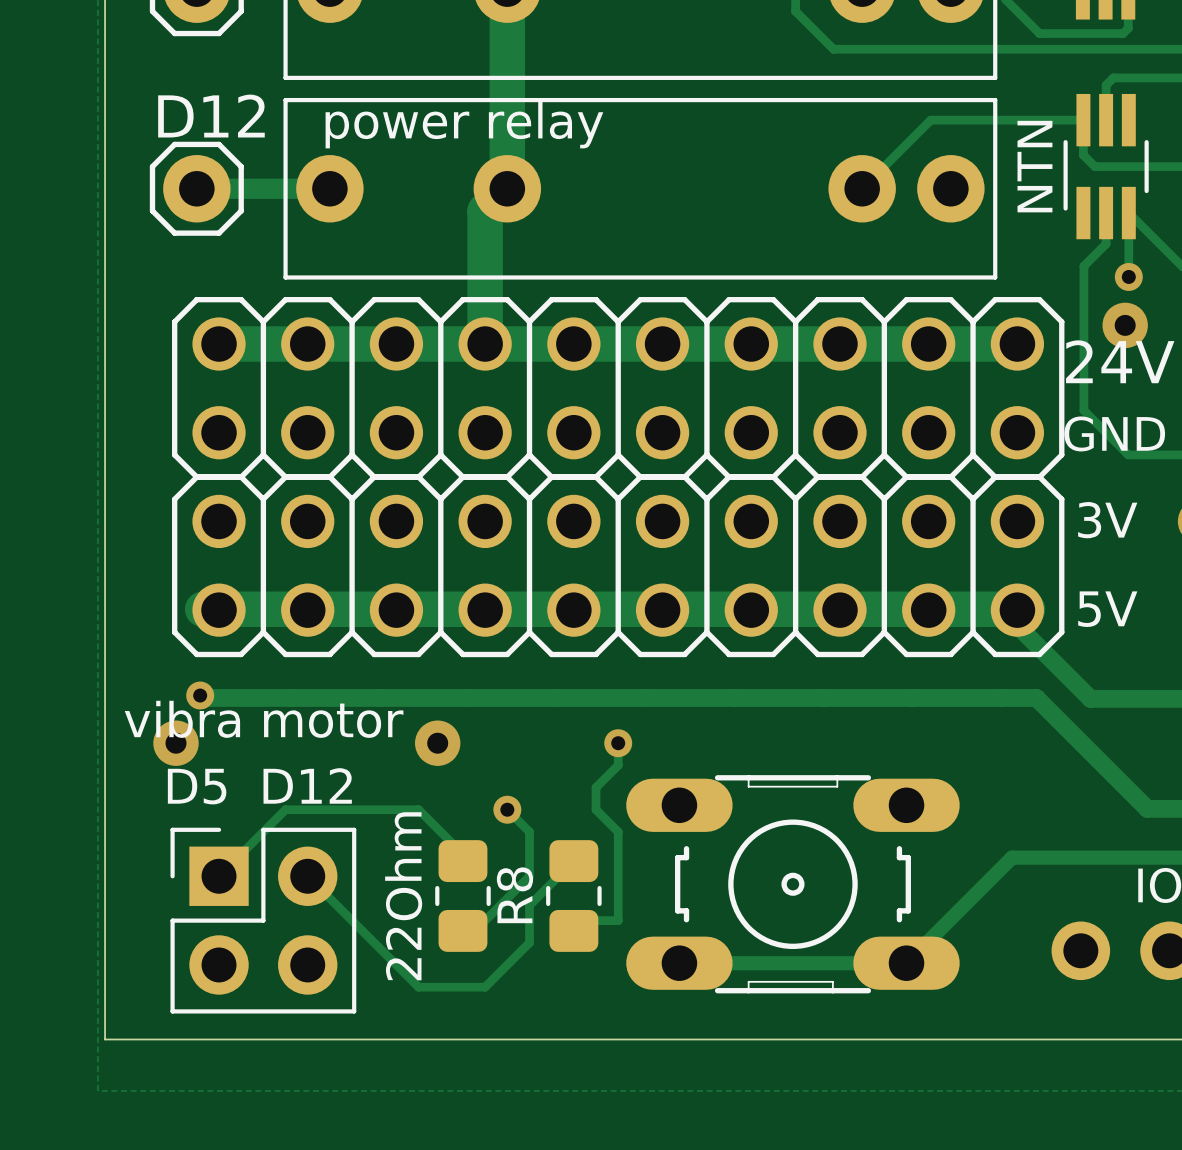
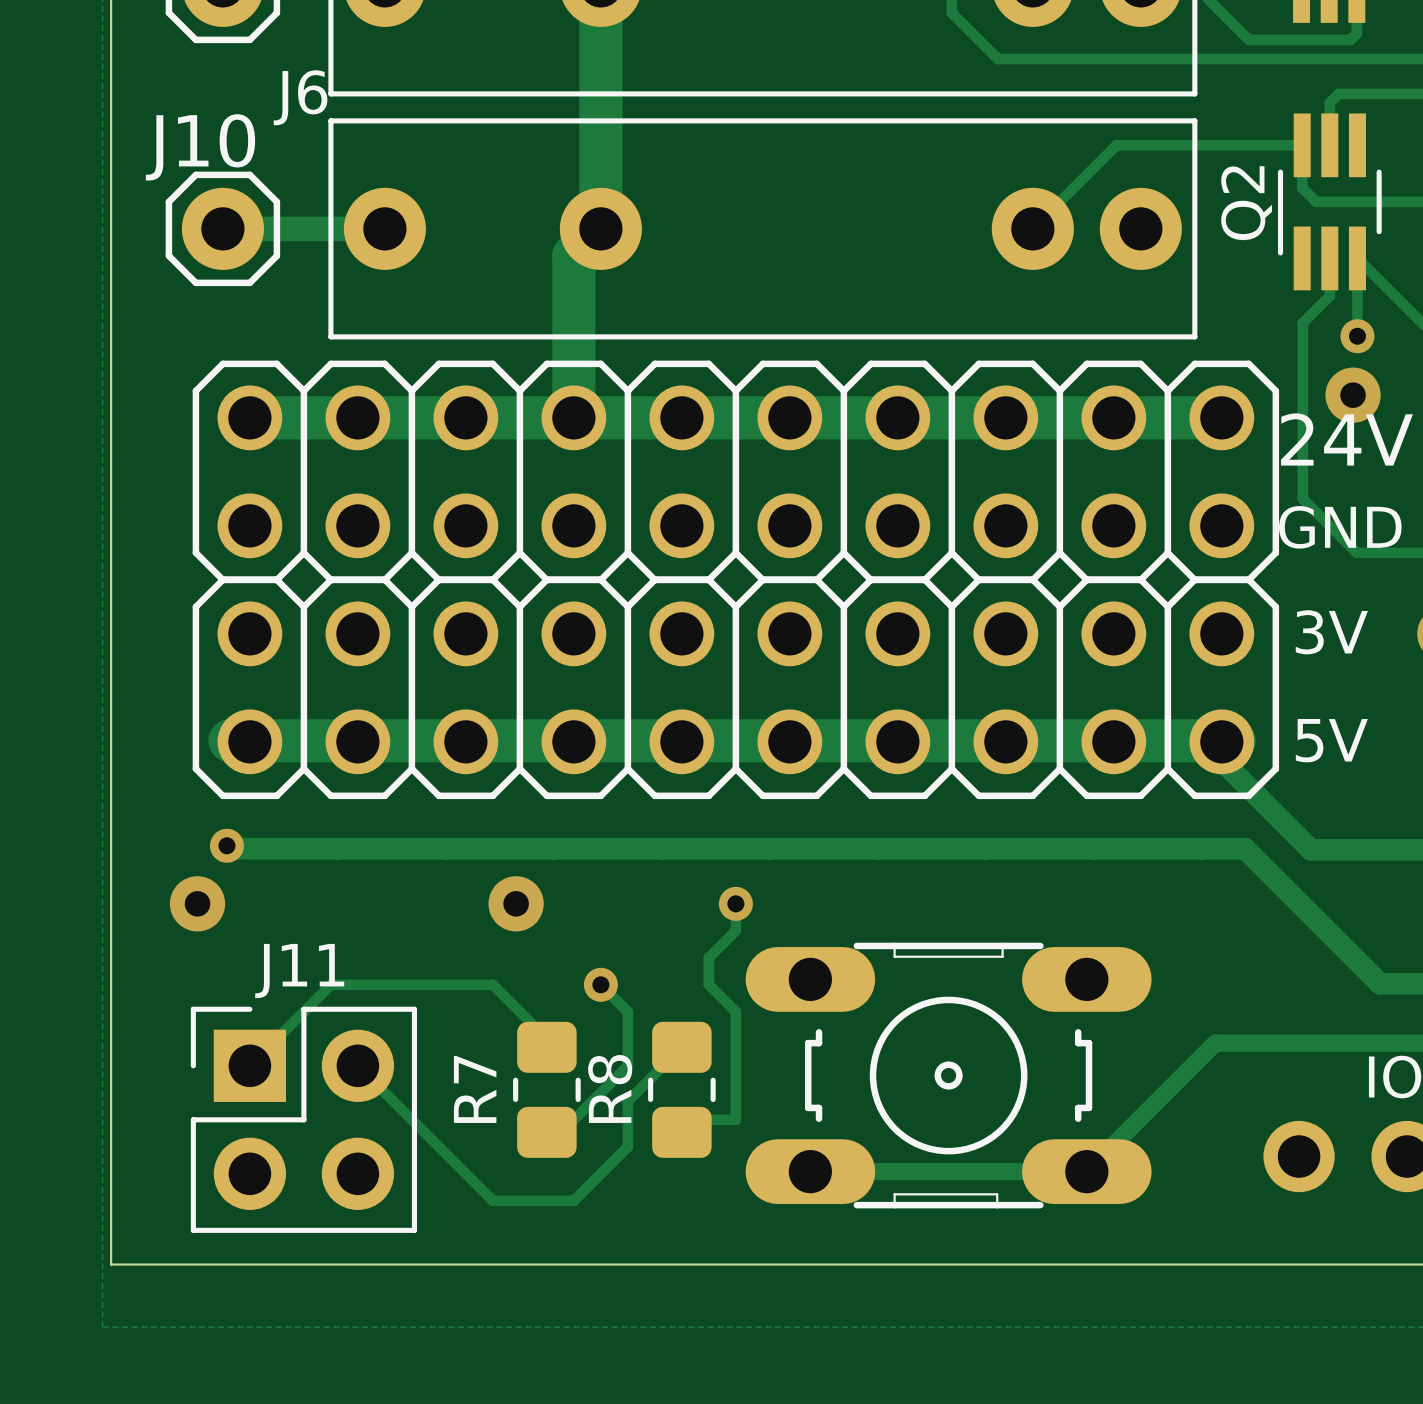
D12 name: D12 (211, 116) -> J10 (200, 147)
power relay name: power relay (464, 125) -> J6 (300, 97)
NTN name: NTN (1034, 166) -> Q2 (1246, 203)
vibra motor name: vibra motor (264, 719) -> J11 (299, 971)
text: D12 (307, 785) -> none
text: D5 (197, 786) -> none
22Ohm name: 22Ohm (403, 896) -> R7 (475, 1089)

